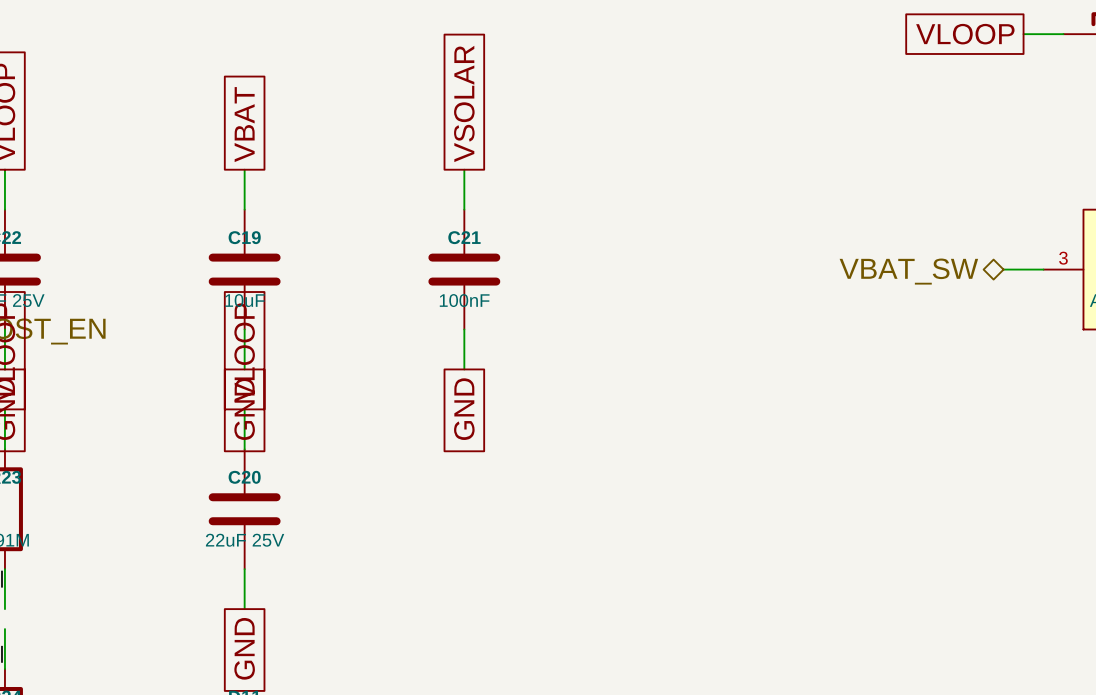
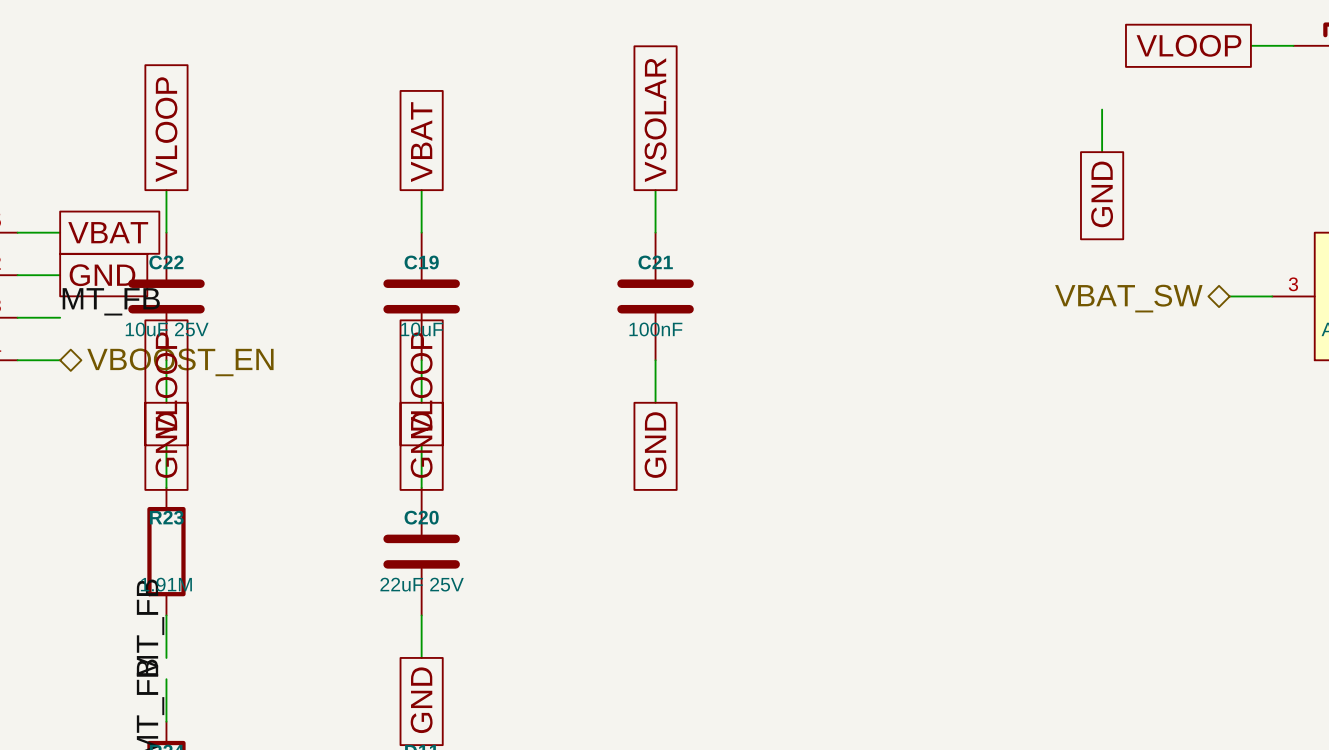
wire: none -> (1102, 109) (1102, 152)
global label: none -> GND (1102, 194)

